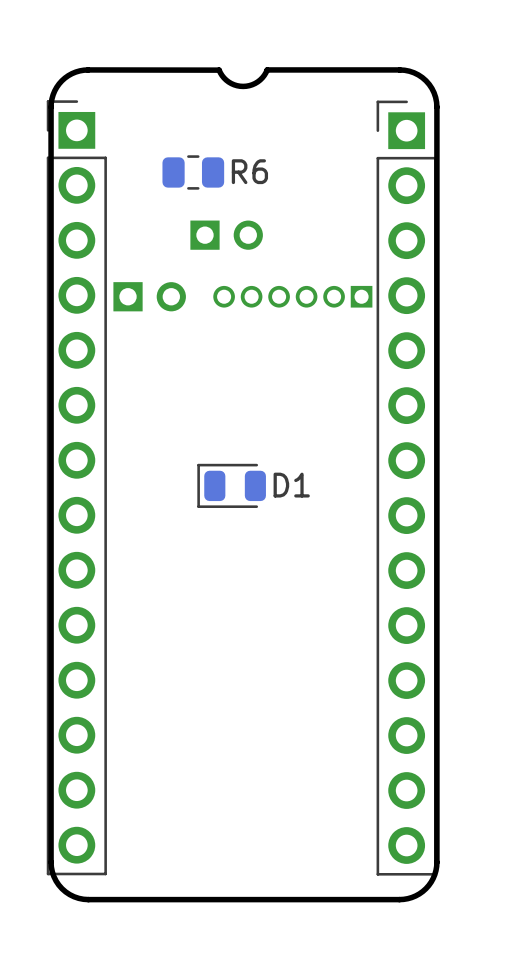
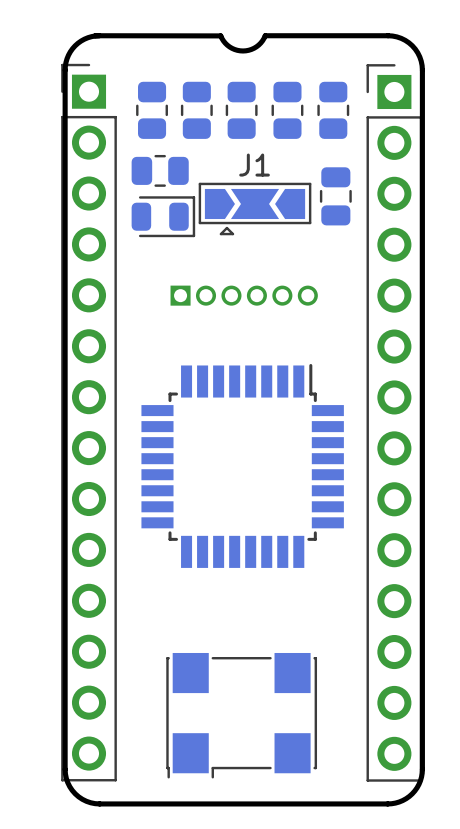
part: none -> (152, 110)
part: none -> (196, 110)
part: none -> (241, 110)
part: none -> (287, 110)
part: none -> (333, 110)
R6: (193, 172) -> none
part: none -> (160, 170)
part: (226, 235) -> none
part: none -> (335, 196)
J1: none -> (255, 209)
part: none -> (163, 216)
part: (149, 296) -> none
part rotation: 0° (292, 296) -> 180° (244, 295)
D1: (231, 485) -> none
part: none -> (242, 465)
part: none -> (241, 715)

